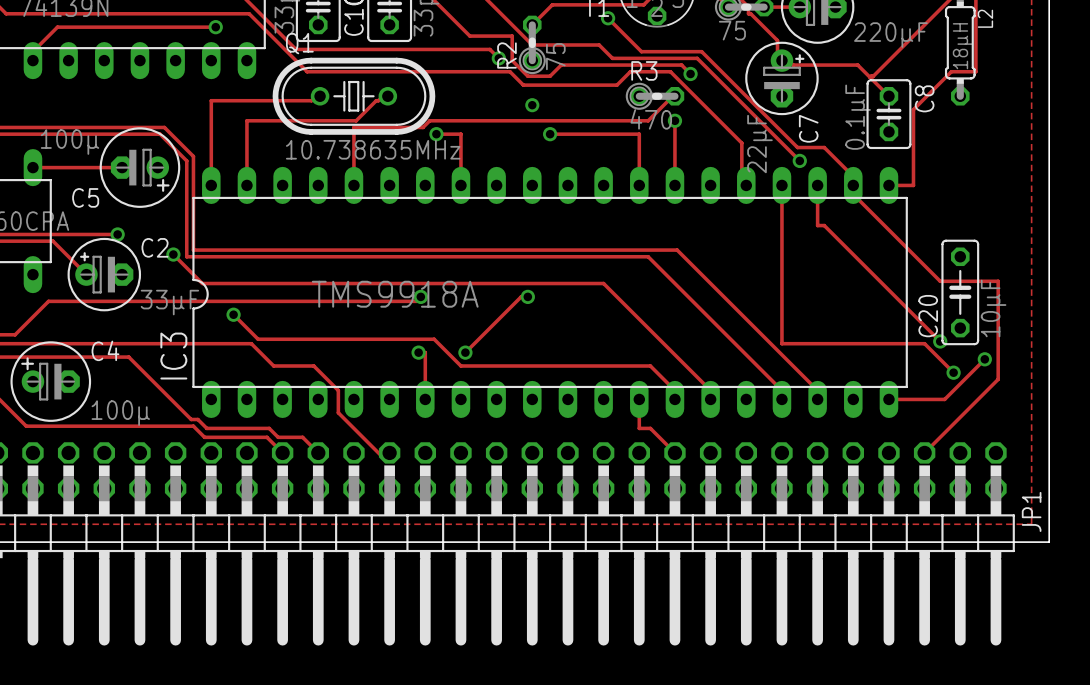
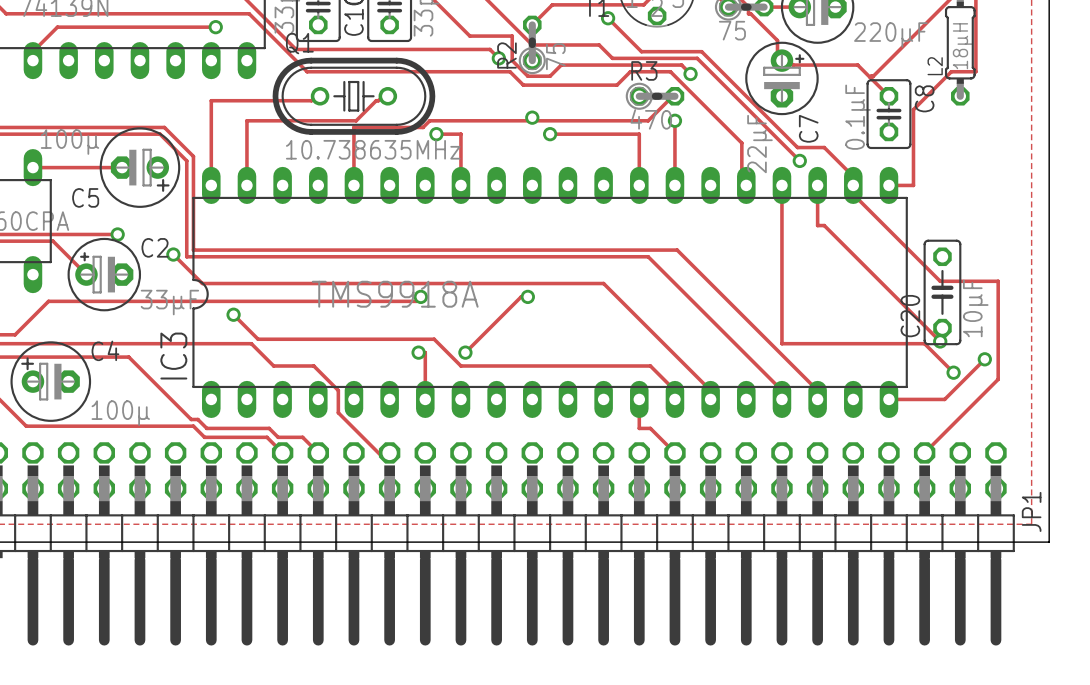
L2 name position: L2 (985, 18) -> L2 (935, 66)
via position: (532, 105) -> (532, 117)
C20 position: (960, 292) -> (942, 292)

